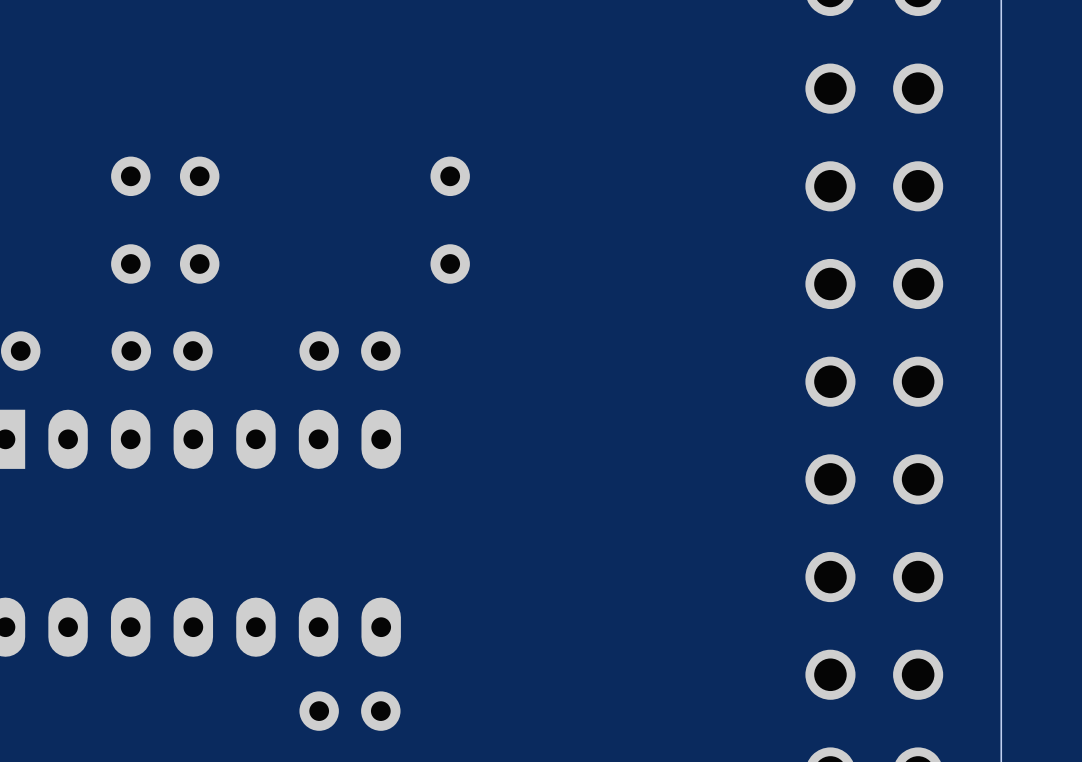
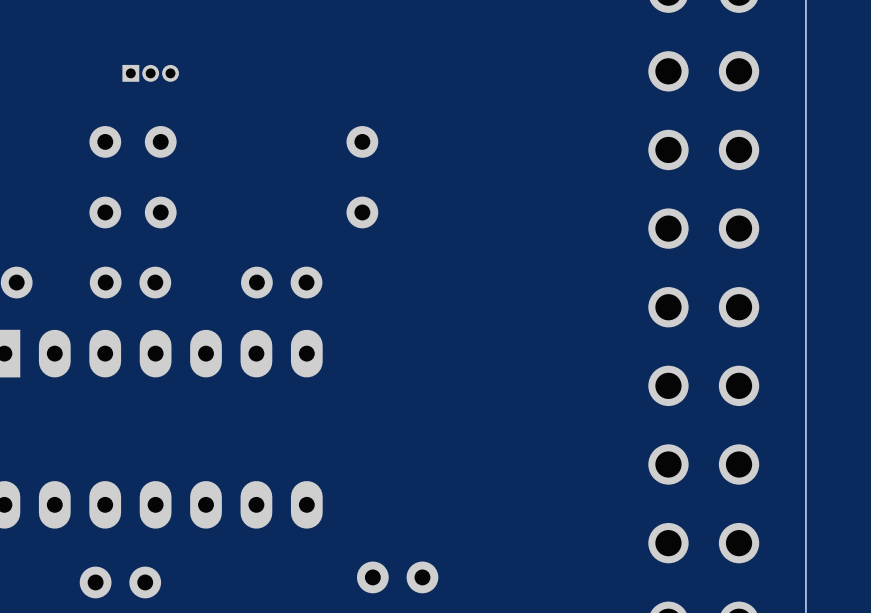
part: none -> (150, 73)
part: (349, 711) -> none
part: none -> (397, 577)
part: none -> (120, 582)

